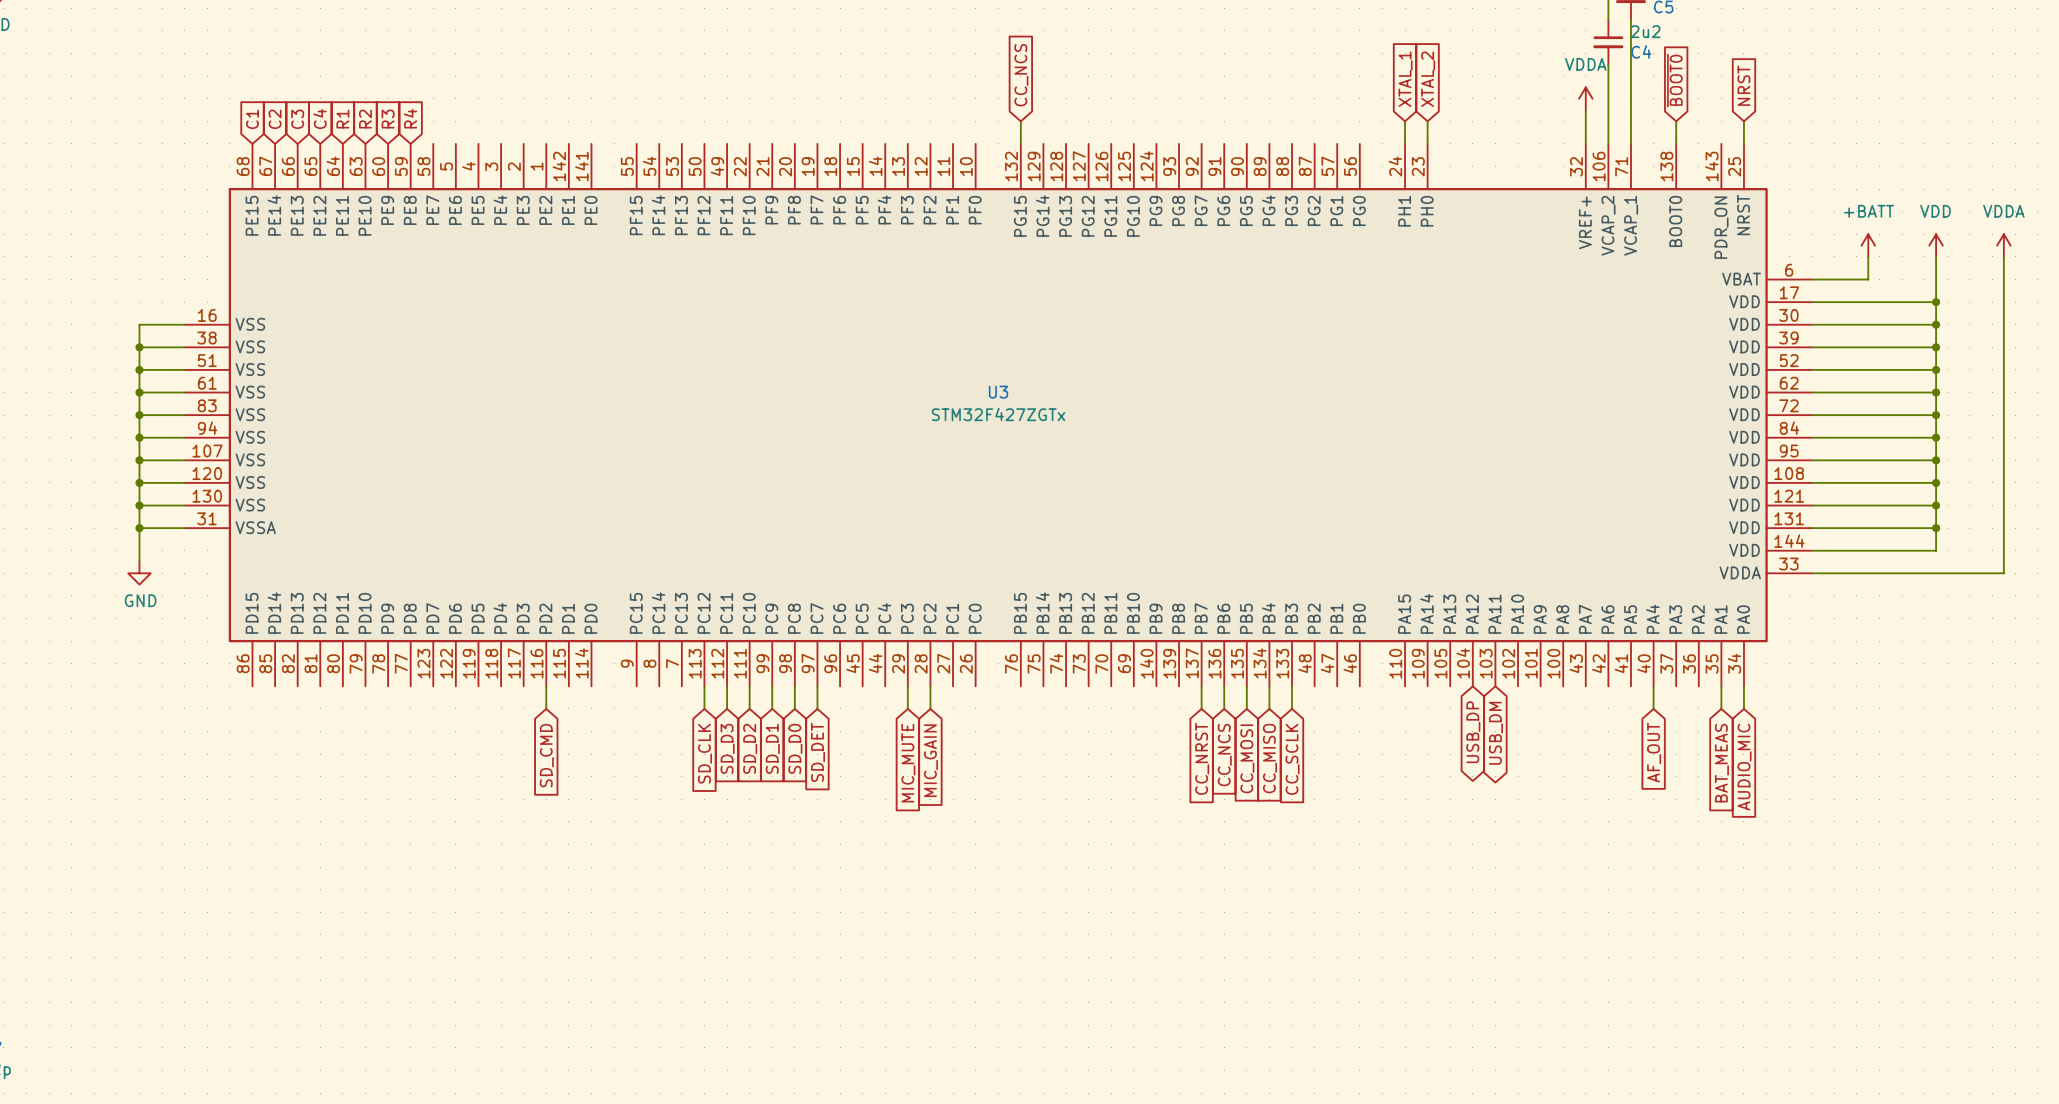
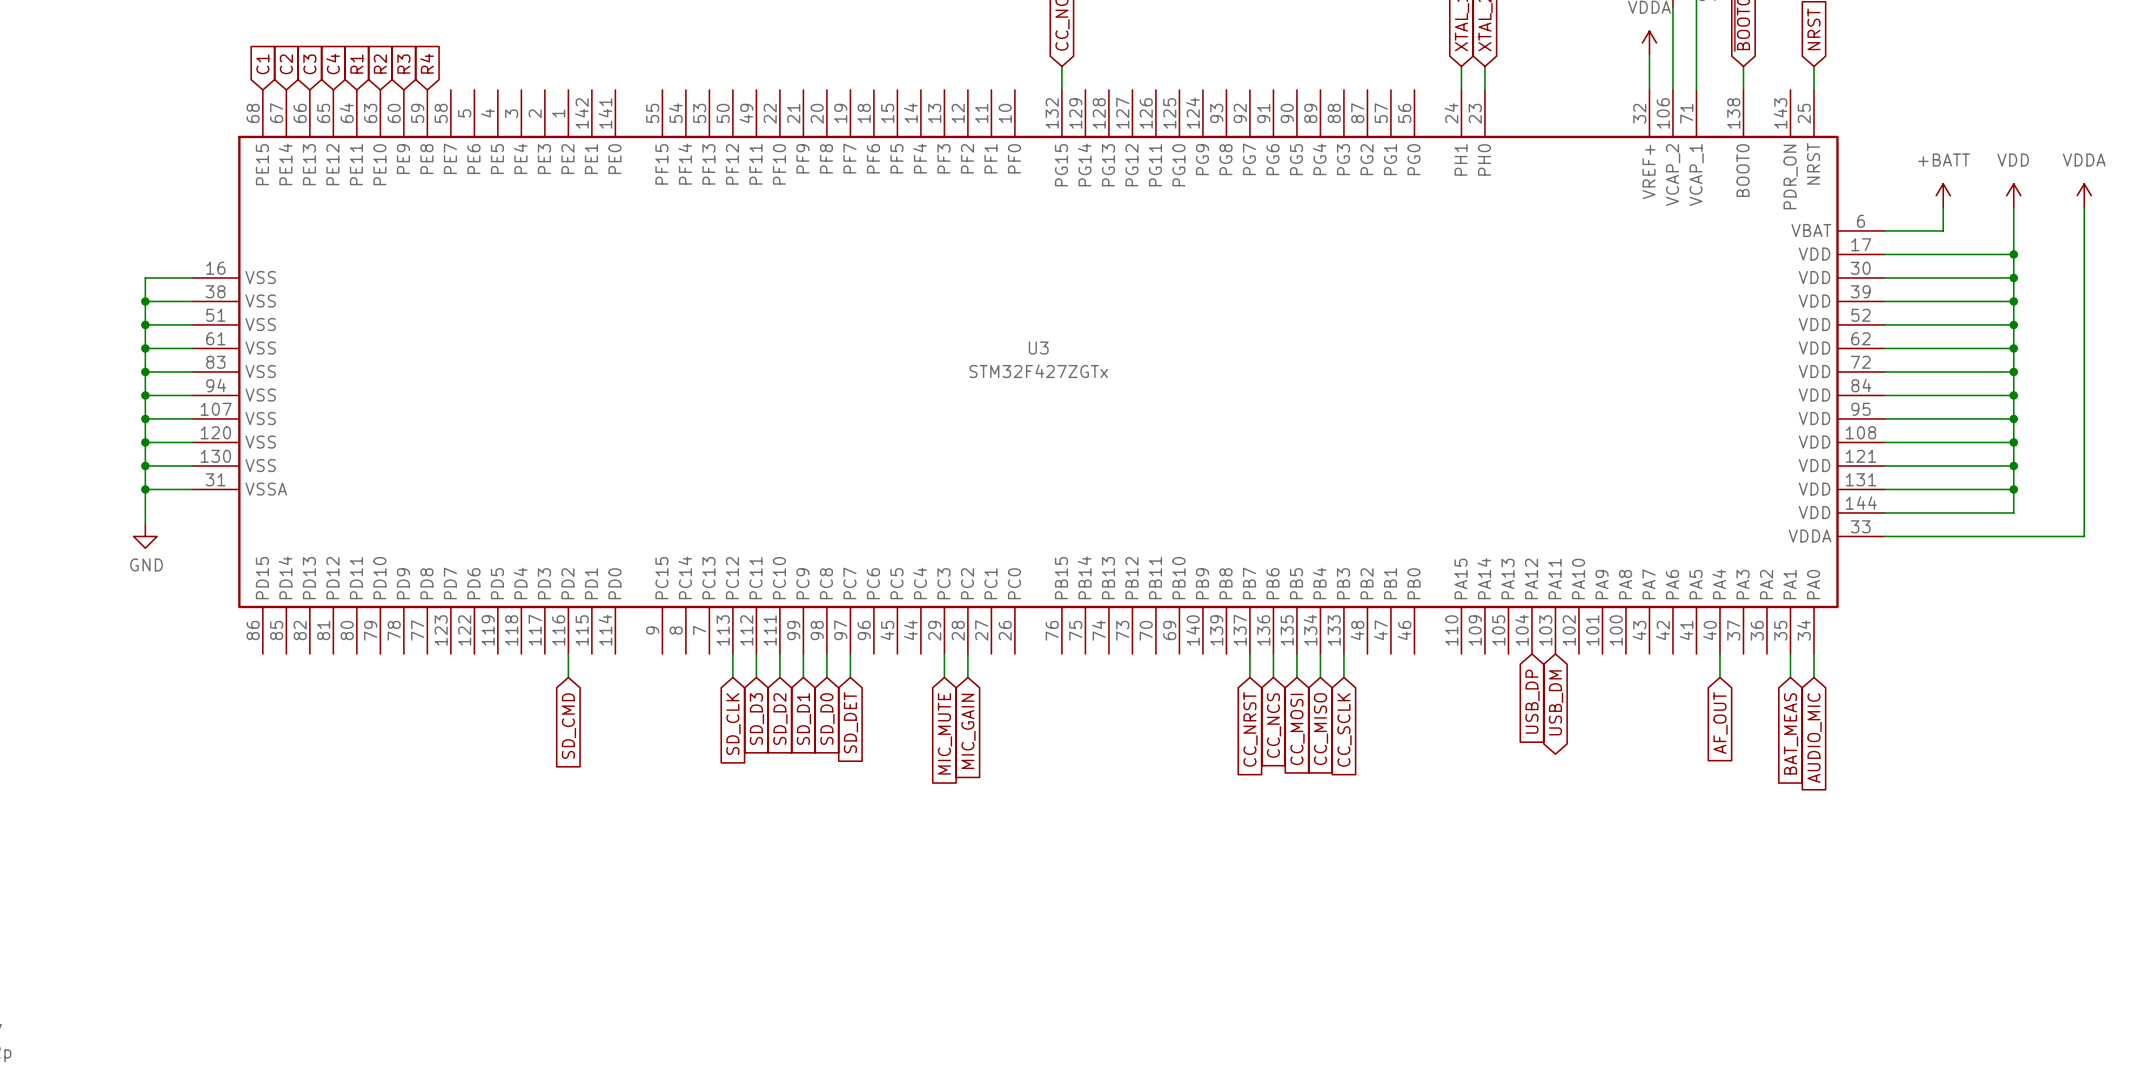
global label shape: bidirectional (1473, 732) -> input (1532, 701)

